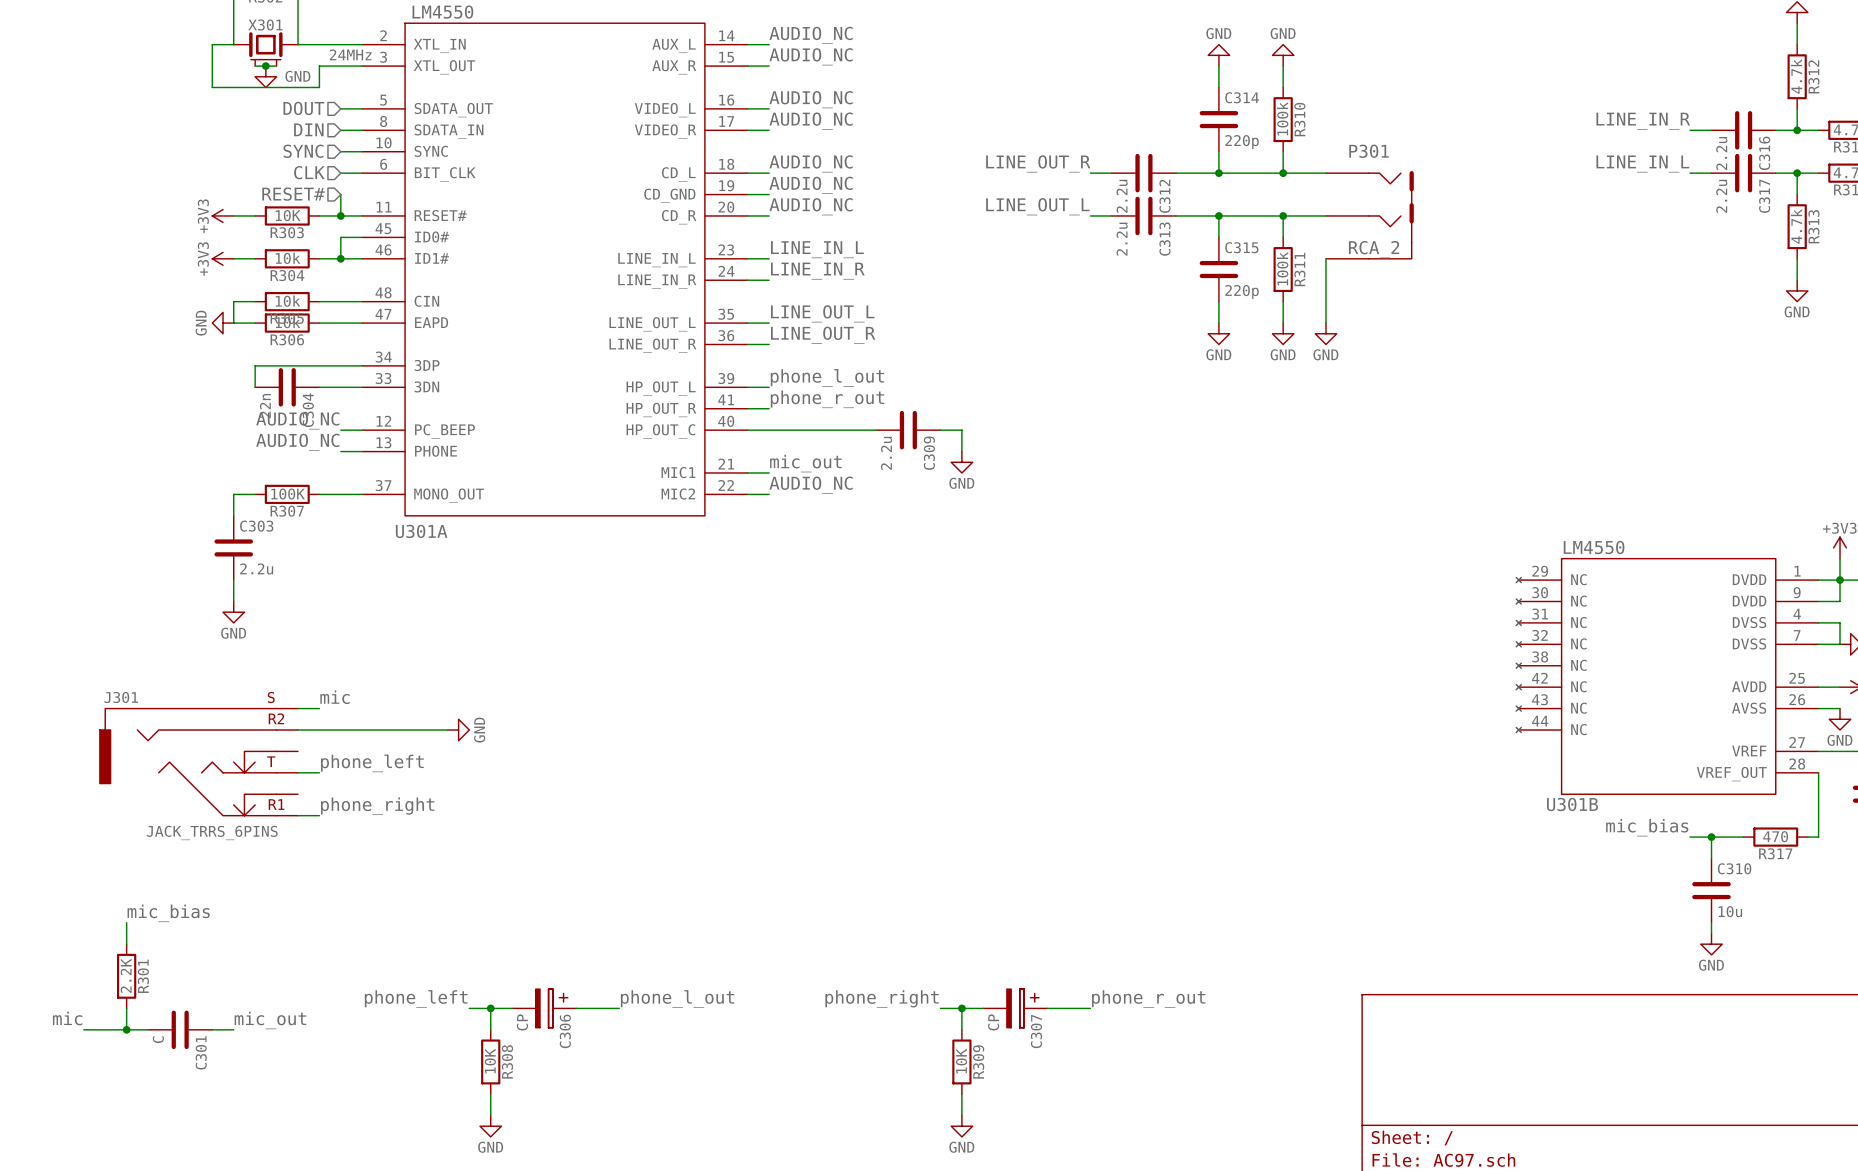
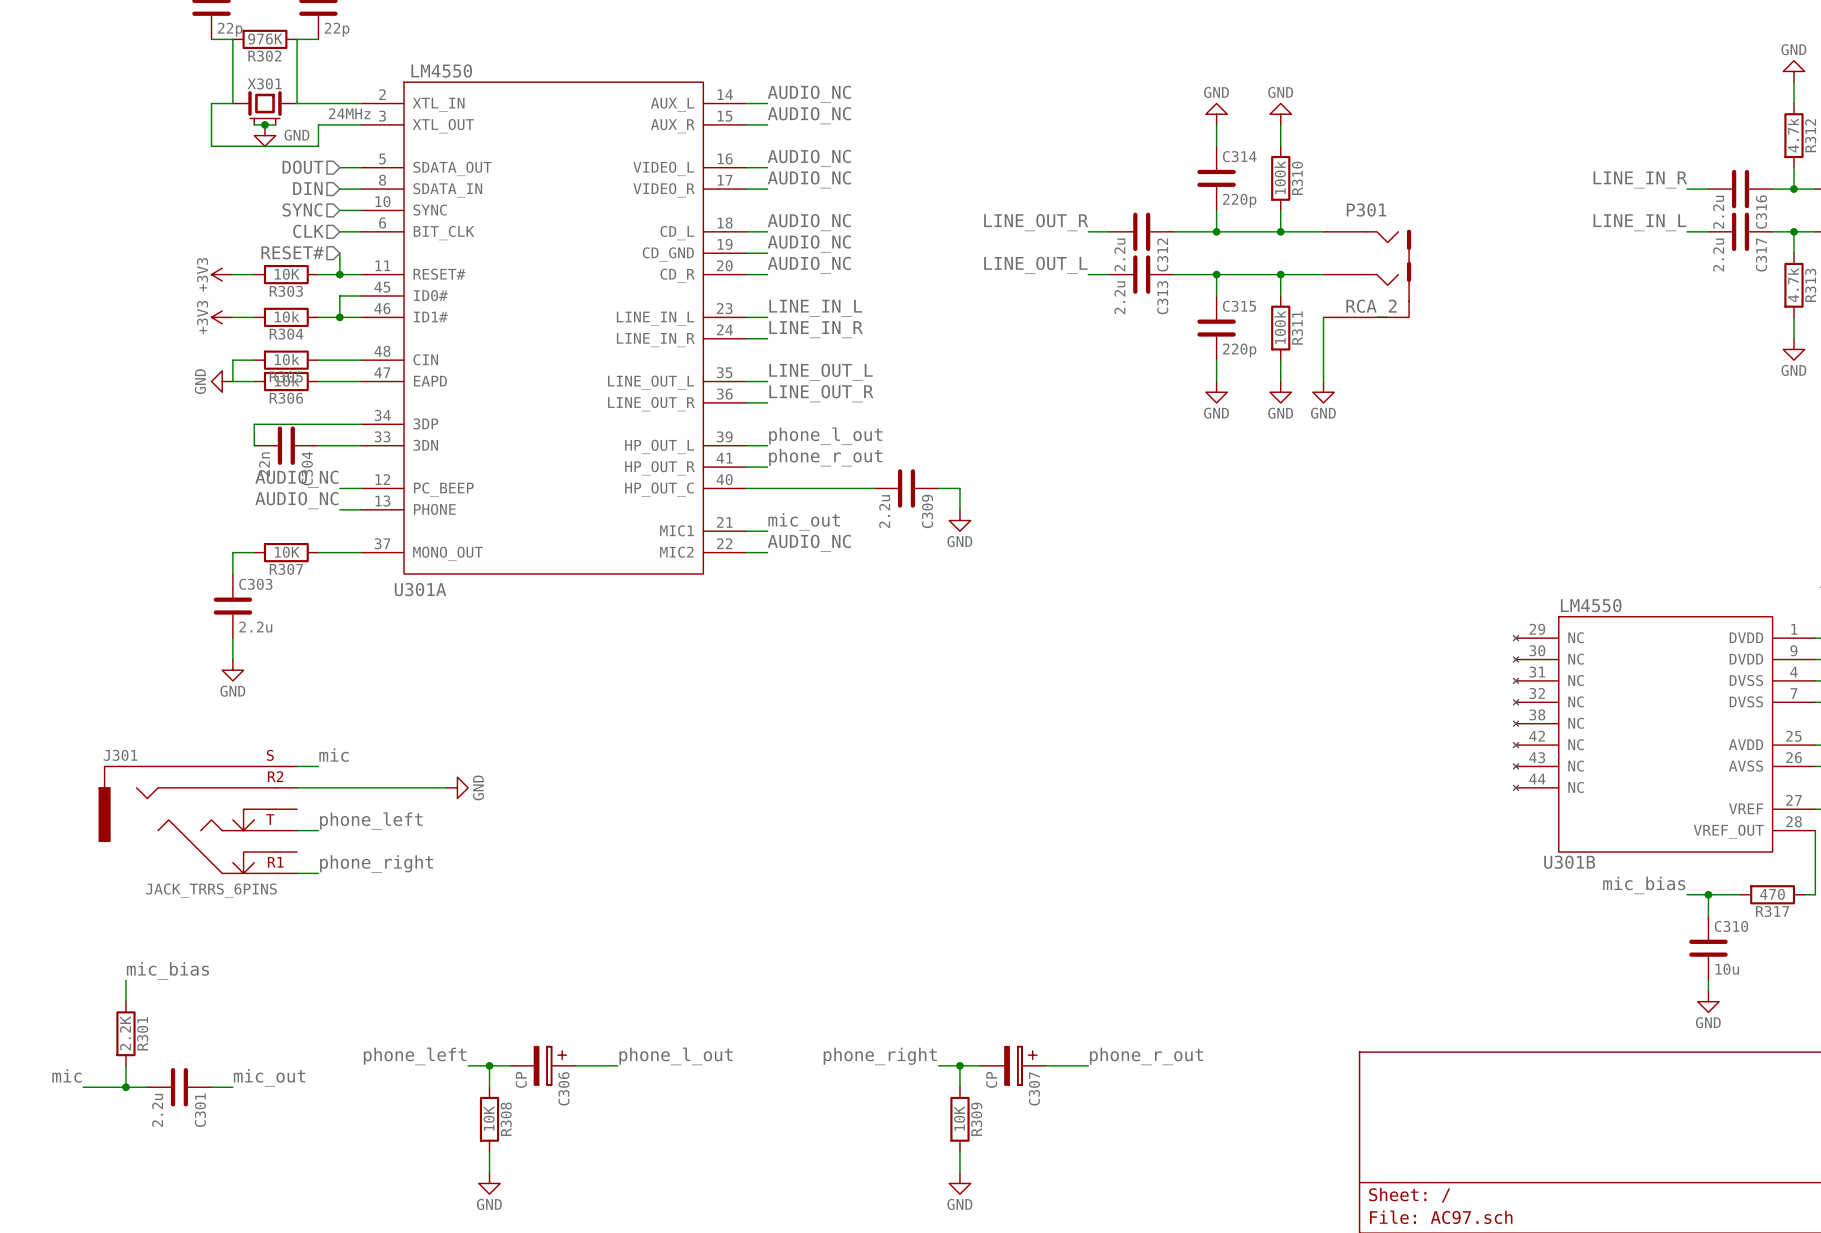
R307 value: 100K (288, 494) -> 10K (287, 552)
C301 value: C (158, 1039) -> 2.2u (157, 1110)

